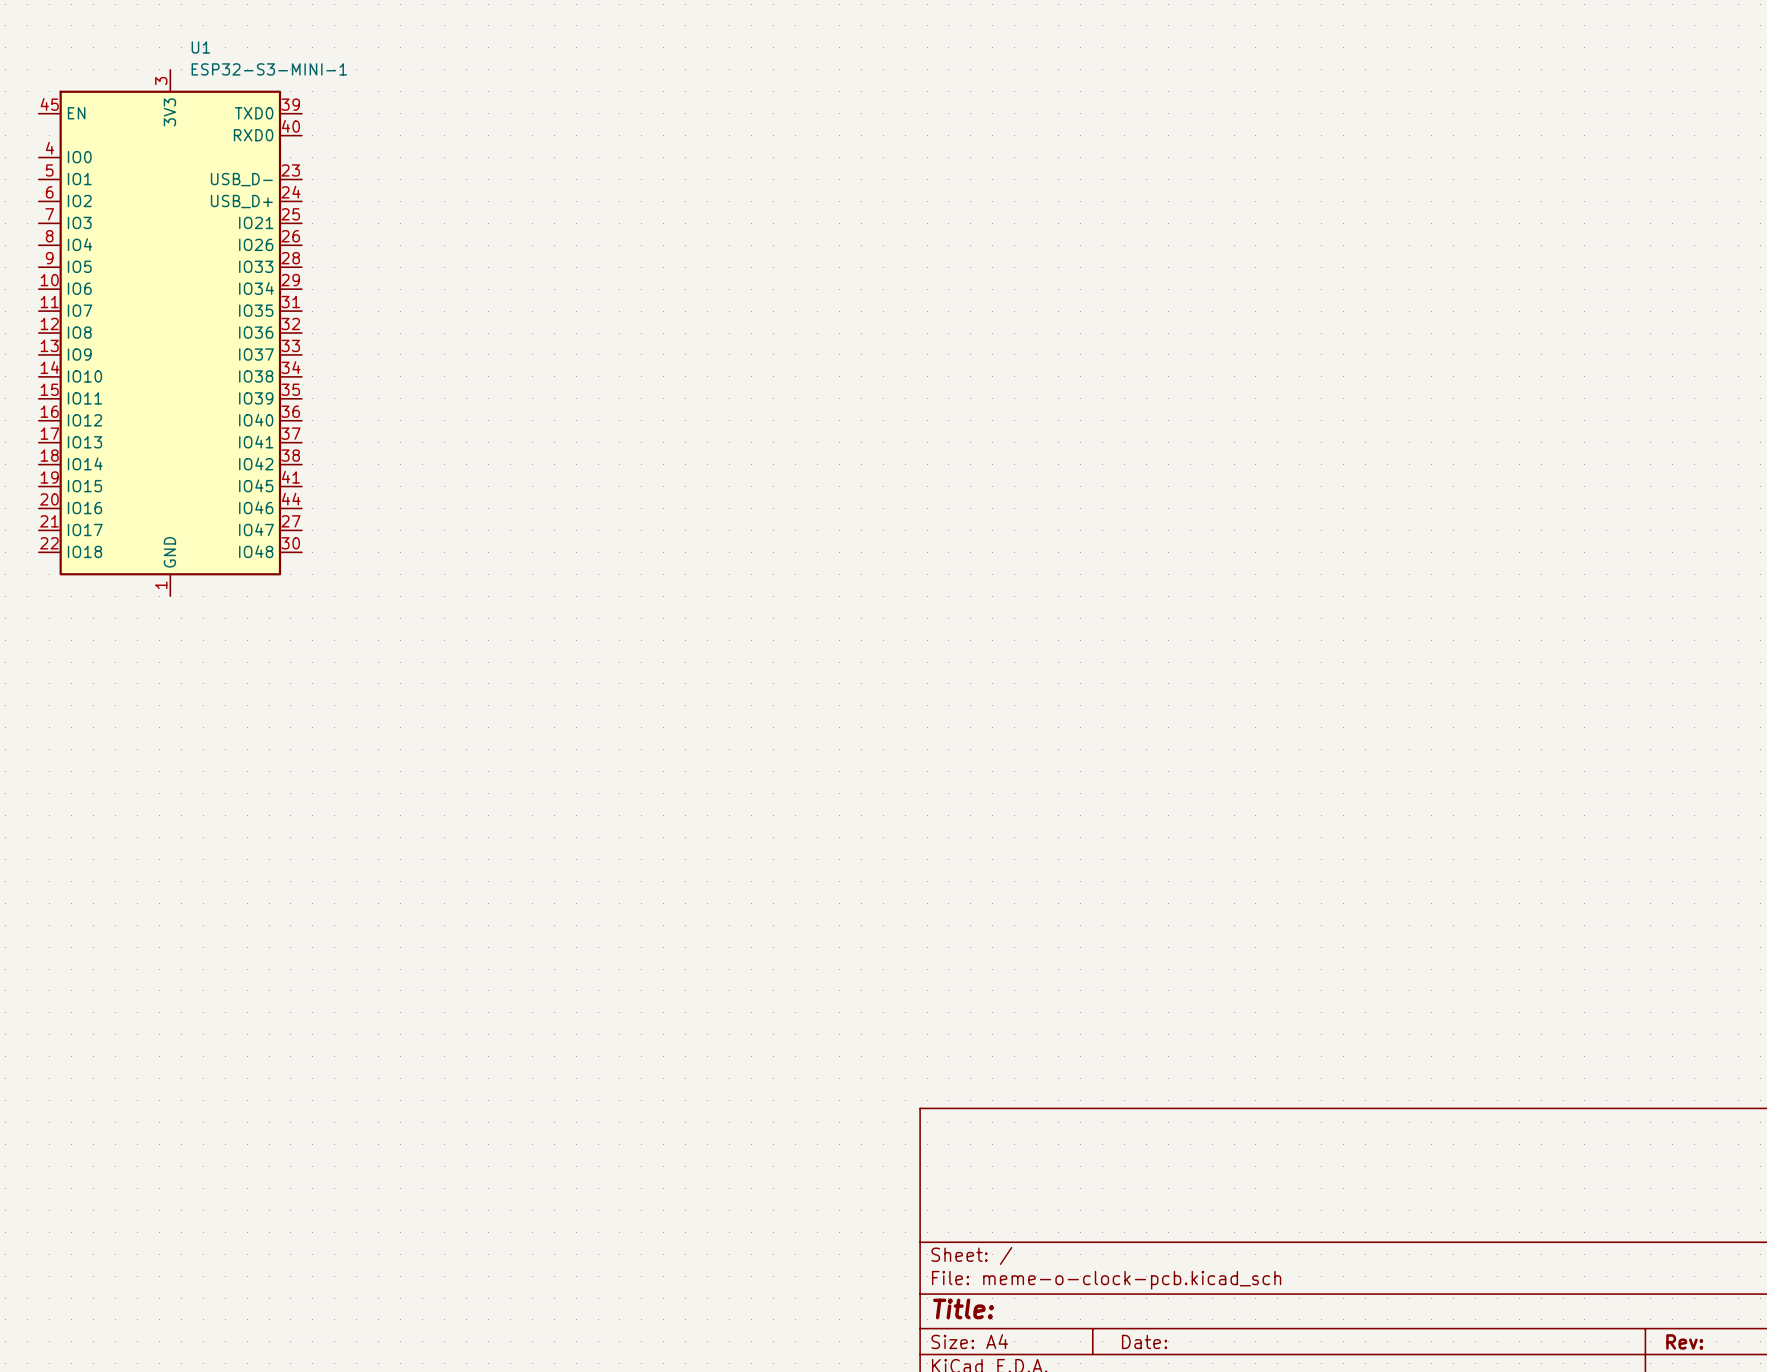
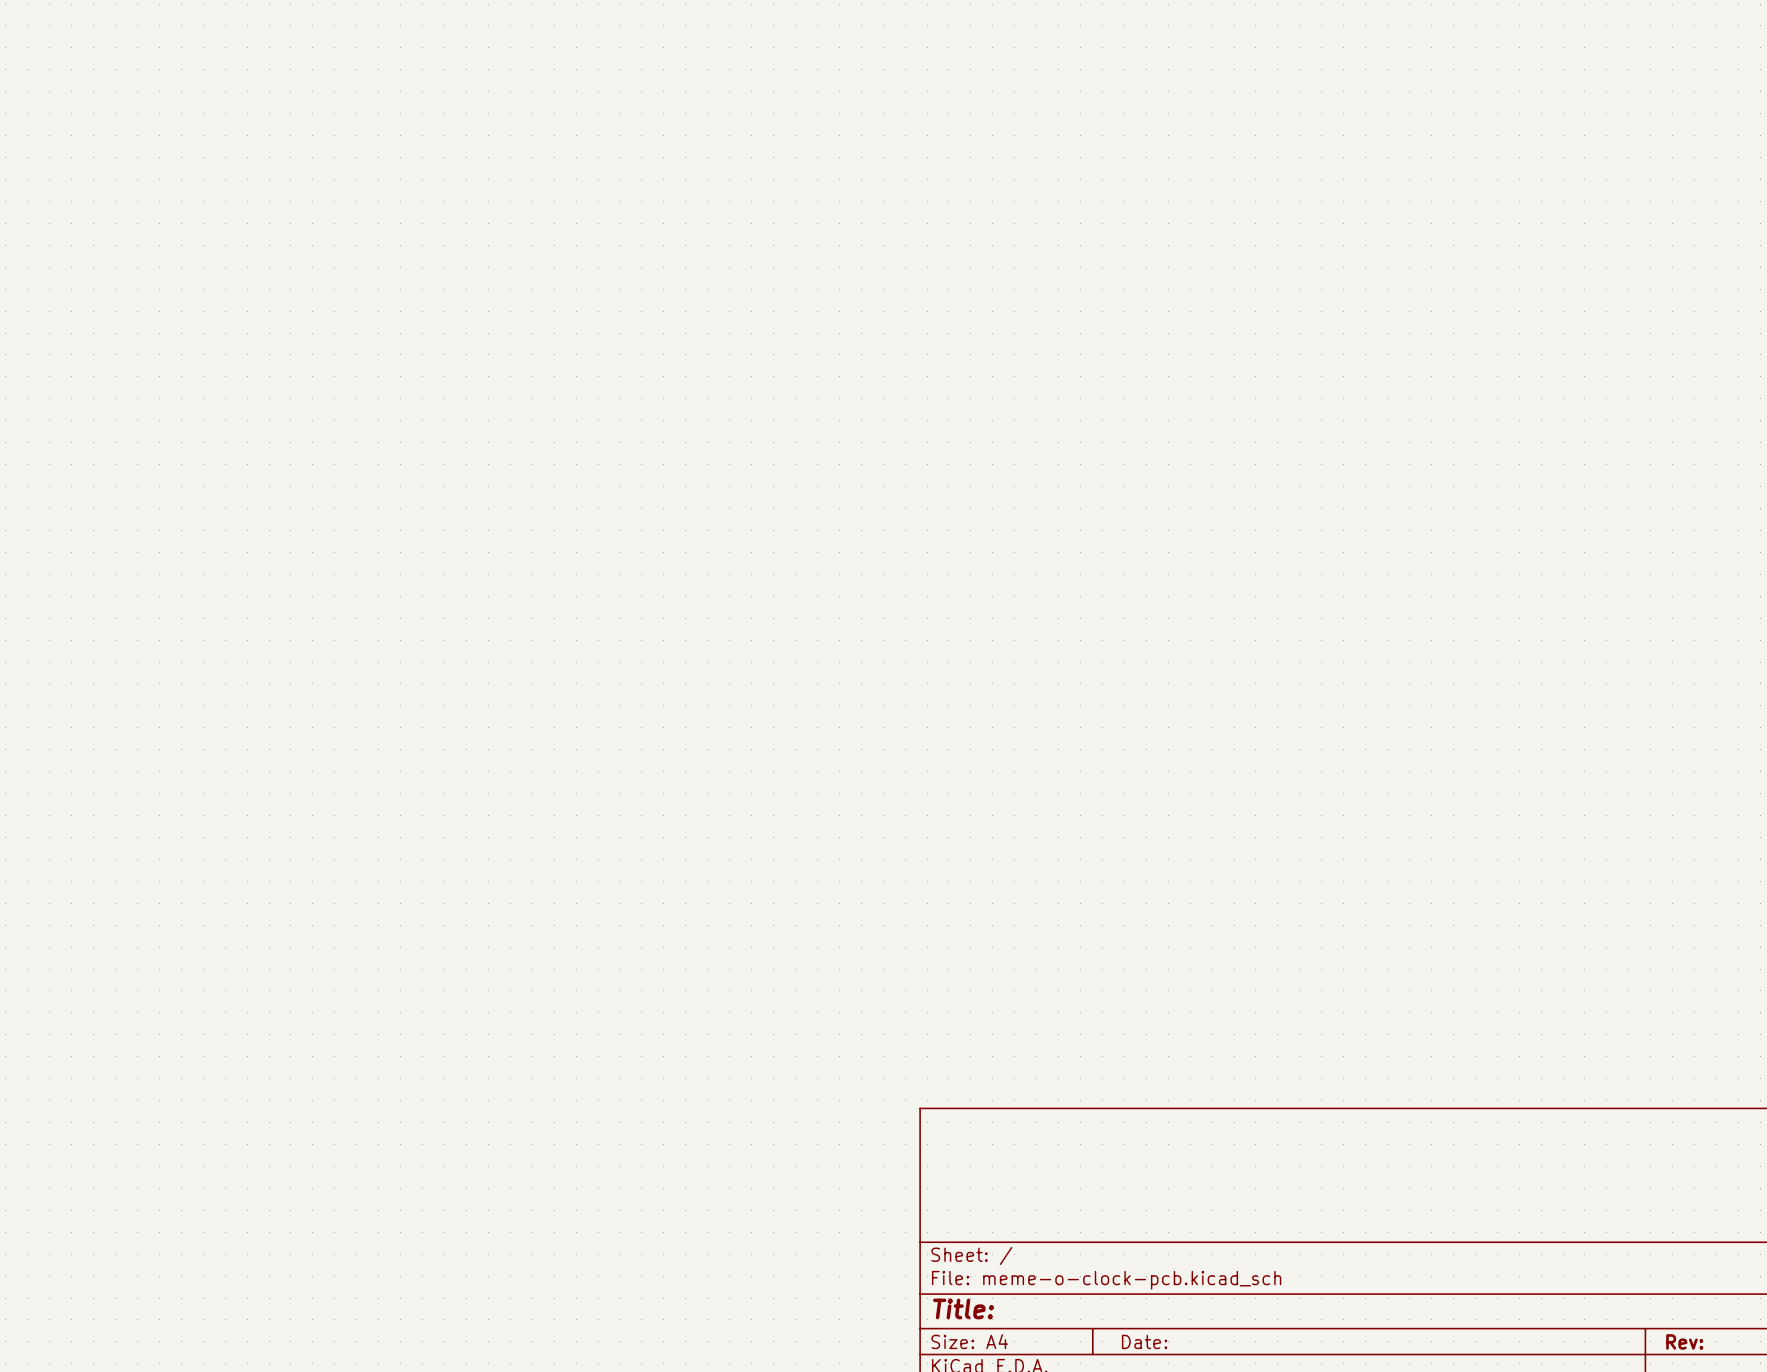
U1: ESP32-S3-MINI-1 (170, 333) -> none

